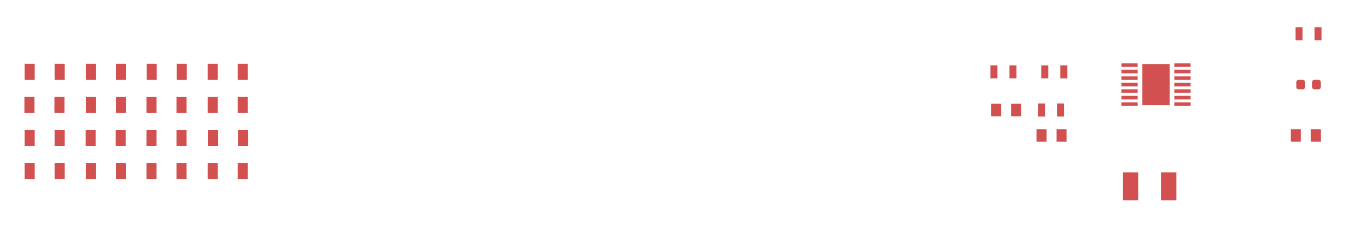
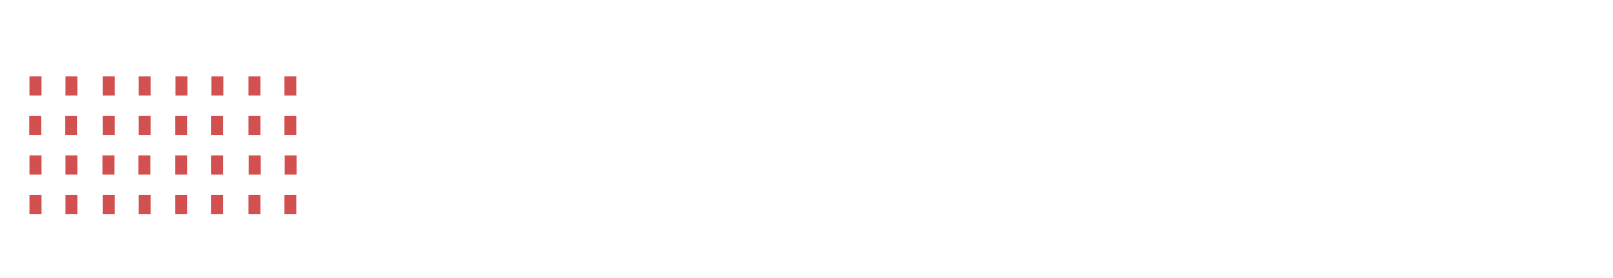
part: (1308, 33) -> none
part: (1003, 71) -> none
part: (1054, 71) -> none
part: (1155, 84) -> none
part: (1308, 84) -> none
part: (1006, 110) -> none
part: (1051, 110) -> none
part: (1051, 135) -> none
part: (1305, 135) -> none
part: (1149, 186) -> none

